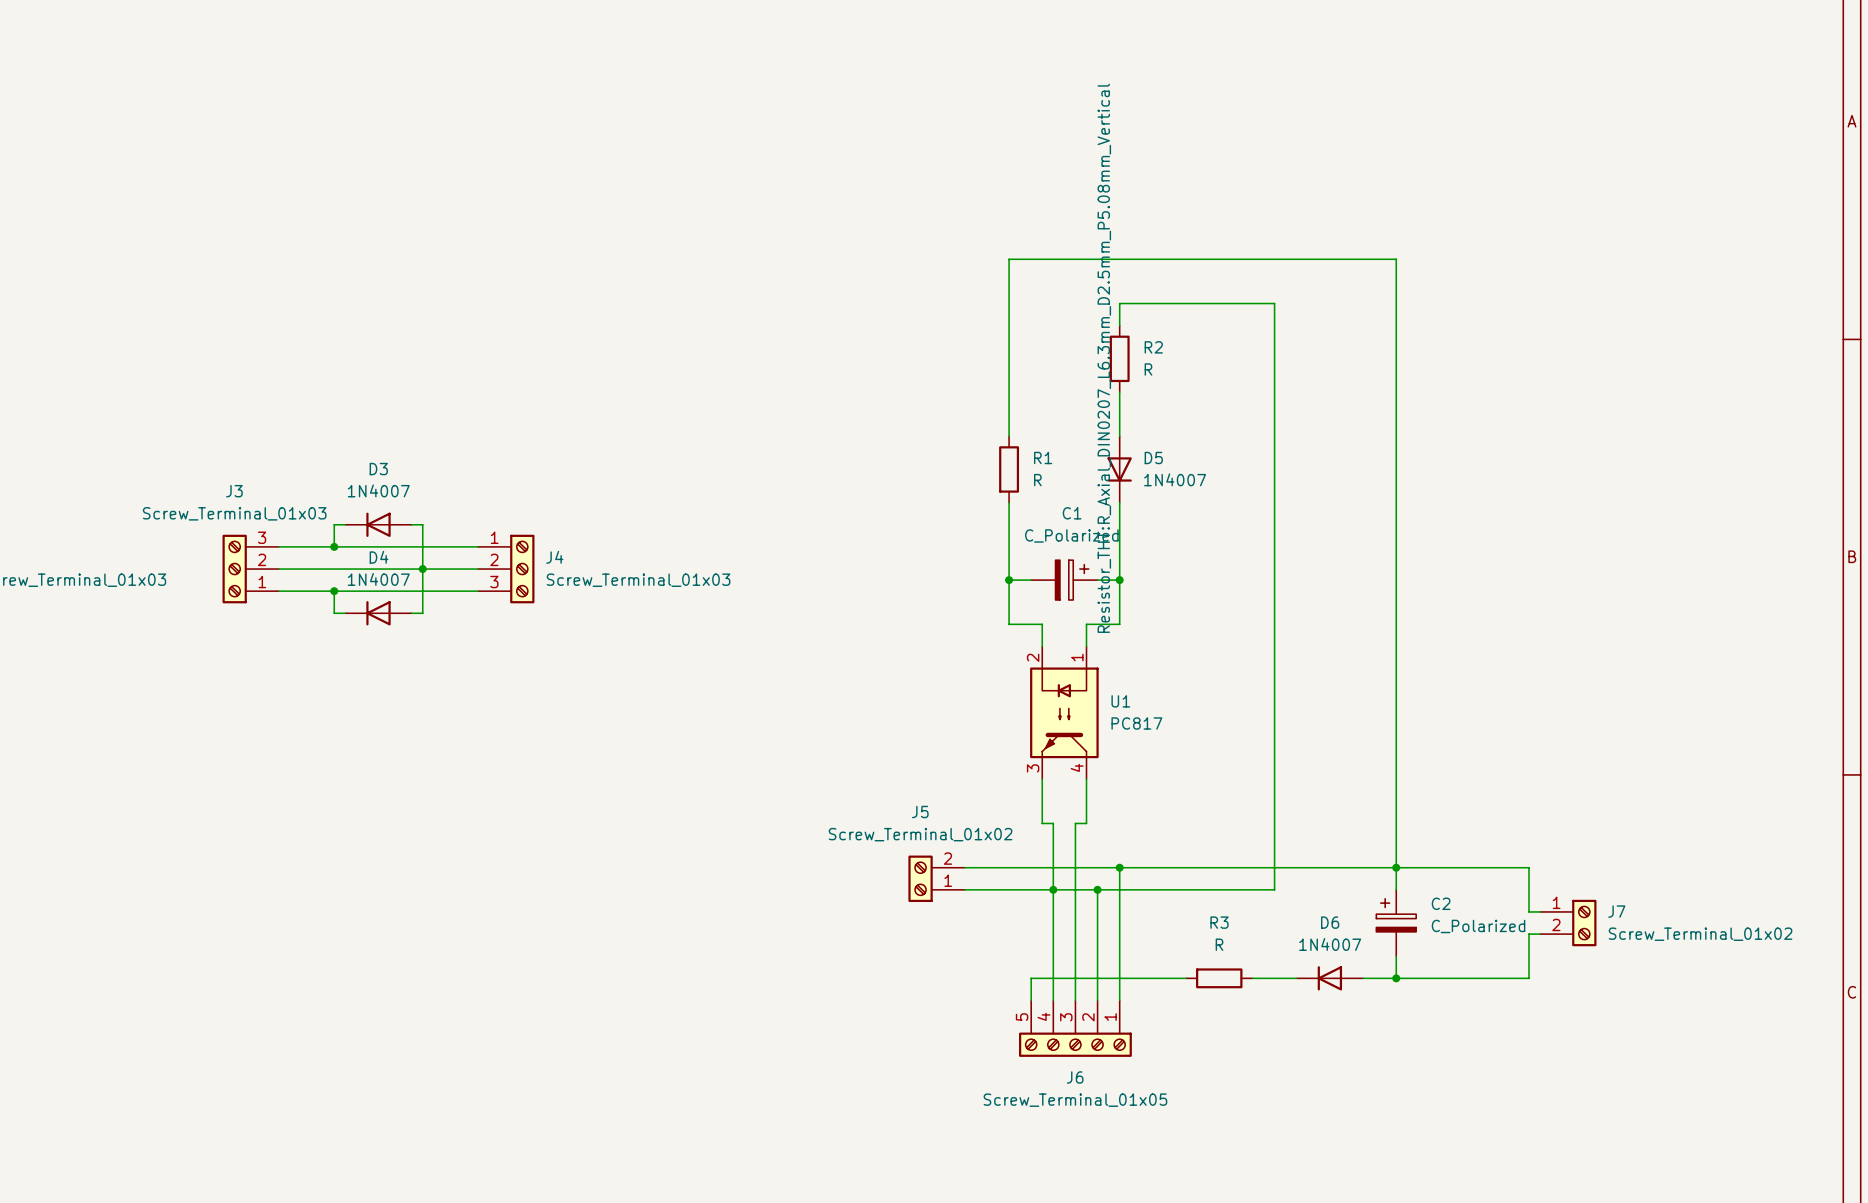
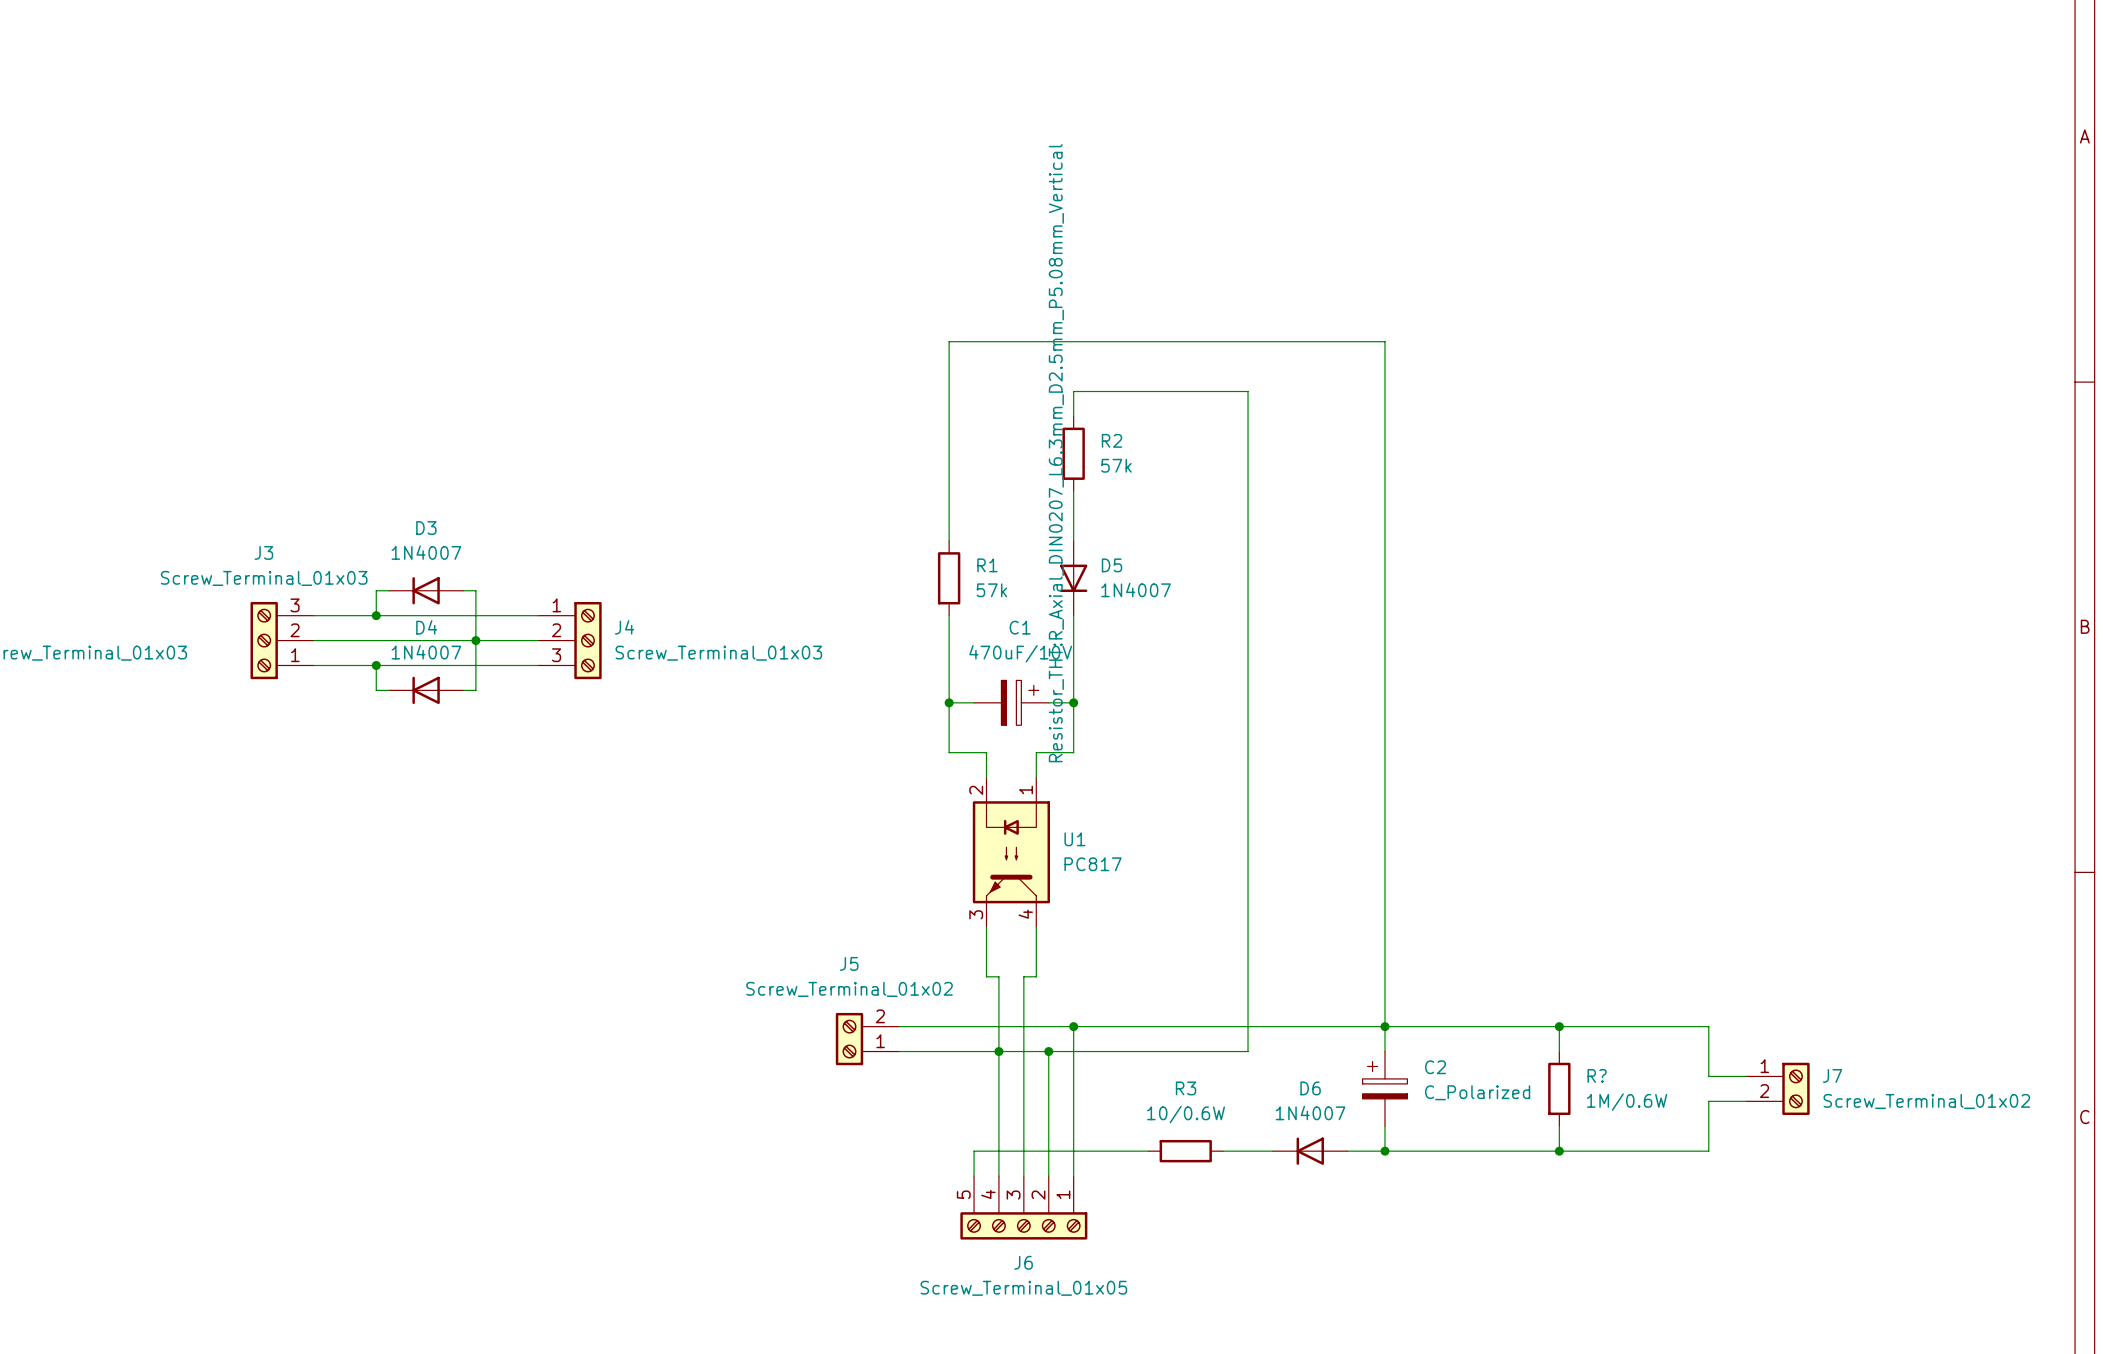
wire: (1119, 303) (1119, 325) -> (1260, 341) (949, 341) (949, 540)
wire: (1230, 303) (1274, 303) (1274, 889) (964, 889) -> (1385, 341) (1385, 1051)
R2 position: (1119, 358) -> (1073, 453)
wire: none -> (1073, 416) (1073, 391) (1248, 391) (1248, 1051) (899, 1051)
R2 value: R (1148, 369) -> 57k (1116, 465)
wire: (1119, 392) (1119, 436) -> (1073, 491) (1073, 540)
wire: (1009, 436) (1009, 259) (1396, 259) (1396, 889) -> none
R1 position: (1009, 469) -> (949, 578)
D5 position: (1119, 469) -> (1073, 578)
R1 value: R (1037, 480) -> 57k (991, 590)
wire: (1009, 502) (1009, 624) (1042, 624) (1042, 646) -> (949, 615) (949, 752) (986, 752) (986, 777)
wire: (1119, 502) (1119, 624) (1086, 624) (1086, 646) -> (1073, 615) (1073, 752) (1036, 752) (1036, 777)
C1 value: C_Polarized (1071, 535) -> 470uF/10V (1020, 653)
wire: (1009, 580) (1031, 580) -> (949, 702) (974, 702)
junction: (1009, 580) -> none
C1 position: (1064, 580) -> (1011, 702)
wire: (1097, 580) (1119, 580) -> (1048, 702) (1073, 702)
junction: (1119, 580) -> none
junction: none -> (949, 702)
junction: none -> (1073, 702)
U1 position: (1064, 712) -> (1011, 852)
wire: (1042, 779) (1042, 823) (1053, 823) (1053, 1000) -> (986, 927) (986, 976) (998, 976) (998, 1176)
wire: (1086, 779) (1086, 823) (1075, 823) (1075, 1000) -> (1036, 927) (1036, 976) (1023, 976) (1023, 1176)
wire: (964, 867) (1529, 867) (1529, 911) (1540, 911) -> none
wire: (1119, 867) (1119, 1000) -> (1073, 1026) (1073, 1176)
junction: (1119, 867) -> none
junction: (1396, 867) -> none
J5 position: (936, 878) -> (867, 1039)
junction: (1053, 889) -> none
wire: (1097, 889) (1097, 1000) -> (1048, 1051) (1048, 1176)
junction: (1097, 889) -> none
wire: none -> (899, 1026) (1708, 1026) (1708, 1076) (1746, 1076)
junction: none -> (1073, 1026)
junction: none -> (1385, 1026)
wire: none -> (1559, 1026) (1559, 1051)
junction: none -> (1559, 1026)
C2 position: (1396, 923) -> (1385, 1088)
J7 position: (1568, 923) -> (1777, 1088)
junction: none -> (998, 1051)
junction: none -> (1048, 1051)
wire: (1540, 934) (1529, 934) (1529, 978) -> (1746, 1101) (1721, 1101)
R3 value: R (1219, 944) -> 10/0.6W (1186, 1114)
wire: (1396, 956) (1396, 978) -> (1385, 1126) (1385, 1151)
R?: none -> 1M/0.6W (1559, 1088)
wire: (1186, 978) (1031, 978) (1031, 1000) -> (1148, 1151) (974, 1151) (974, 1176)
R3 position: (1219, 978) -> (1185, 1151)
wire: (1252, 978) (1296, 978) -> (1223, 1151) (1272, 1151)
D6 position: (1329, 978) -> (1310, 1151)
wire: (1363, 978) (1517, 978) -> (1347, 1151) (1708, 1151) (1708, 1101)
junction: (1396, 978) -> none
wire: none -> (1559, 1126) (1559, 1151)
junction: none -> (1385, 1151)
junction: none -> (1559, 1151)
J6 position: (1075, 1028) -> (1023, 1207)

